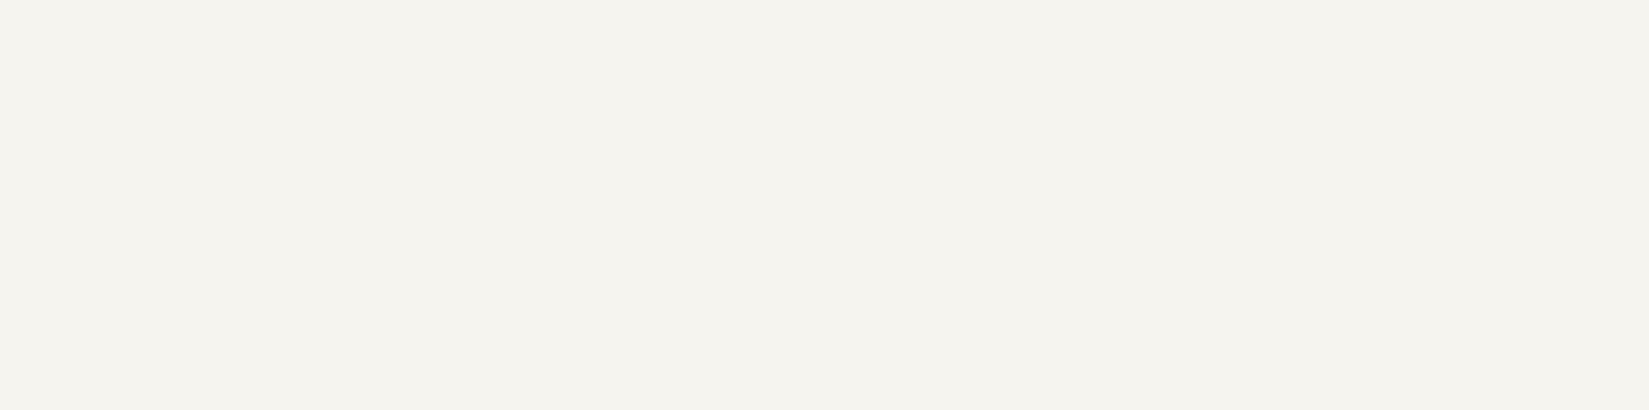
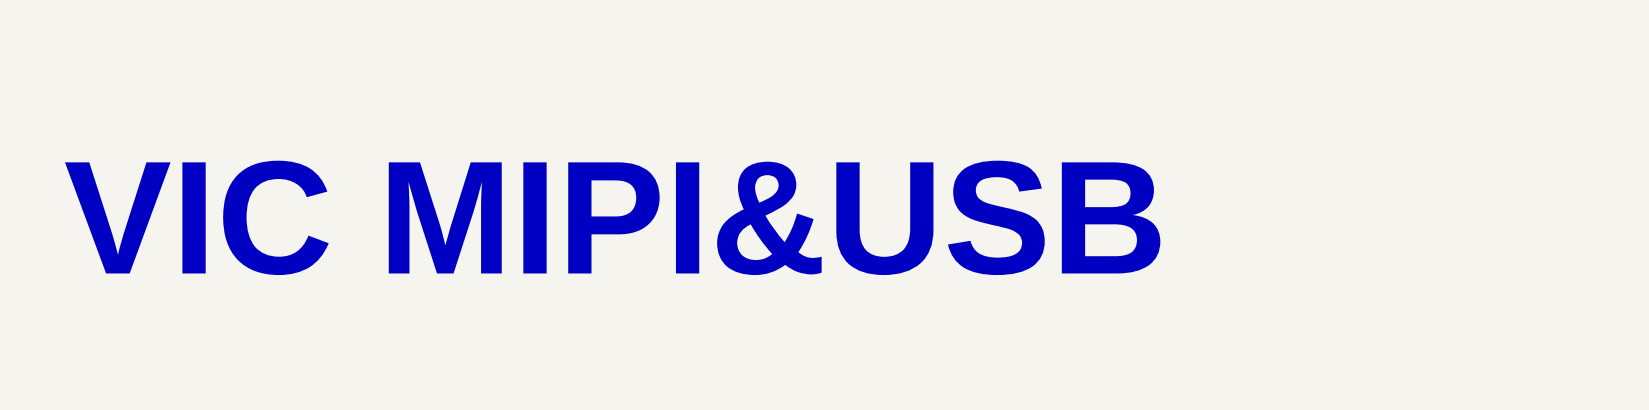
text: none -> VIC MIPI&USB (612, 217)

